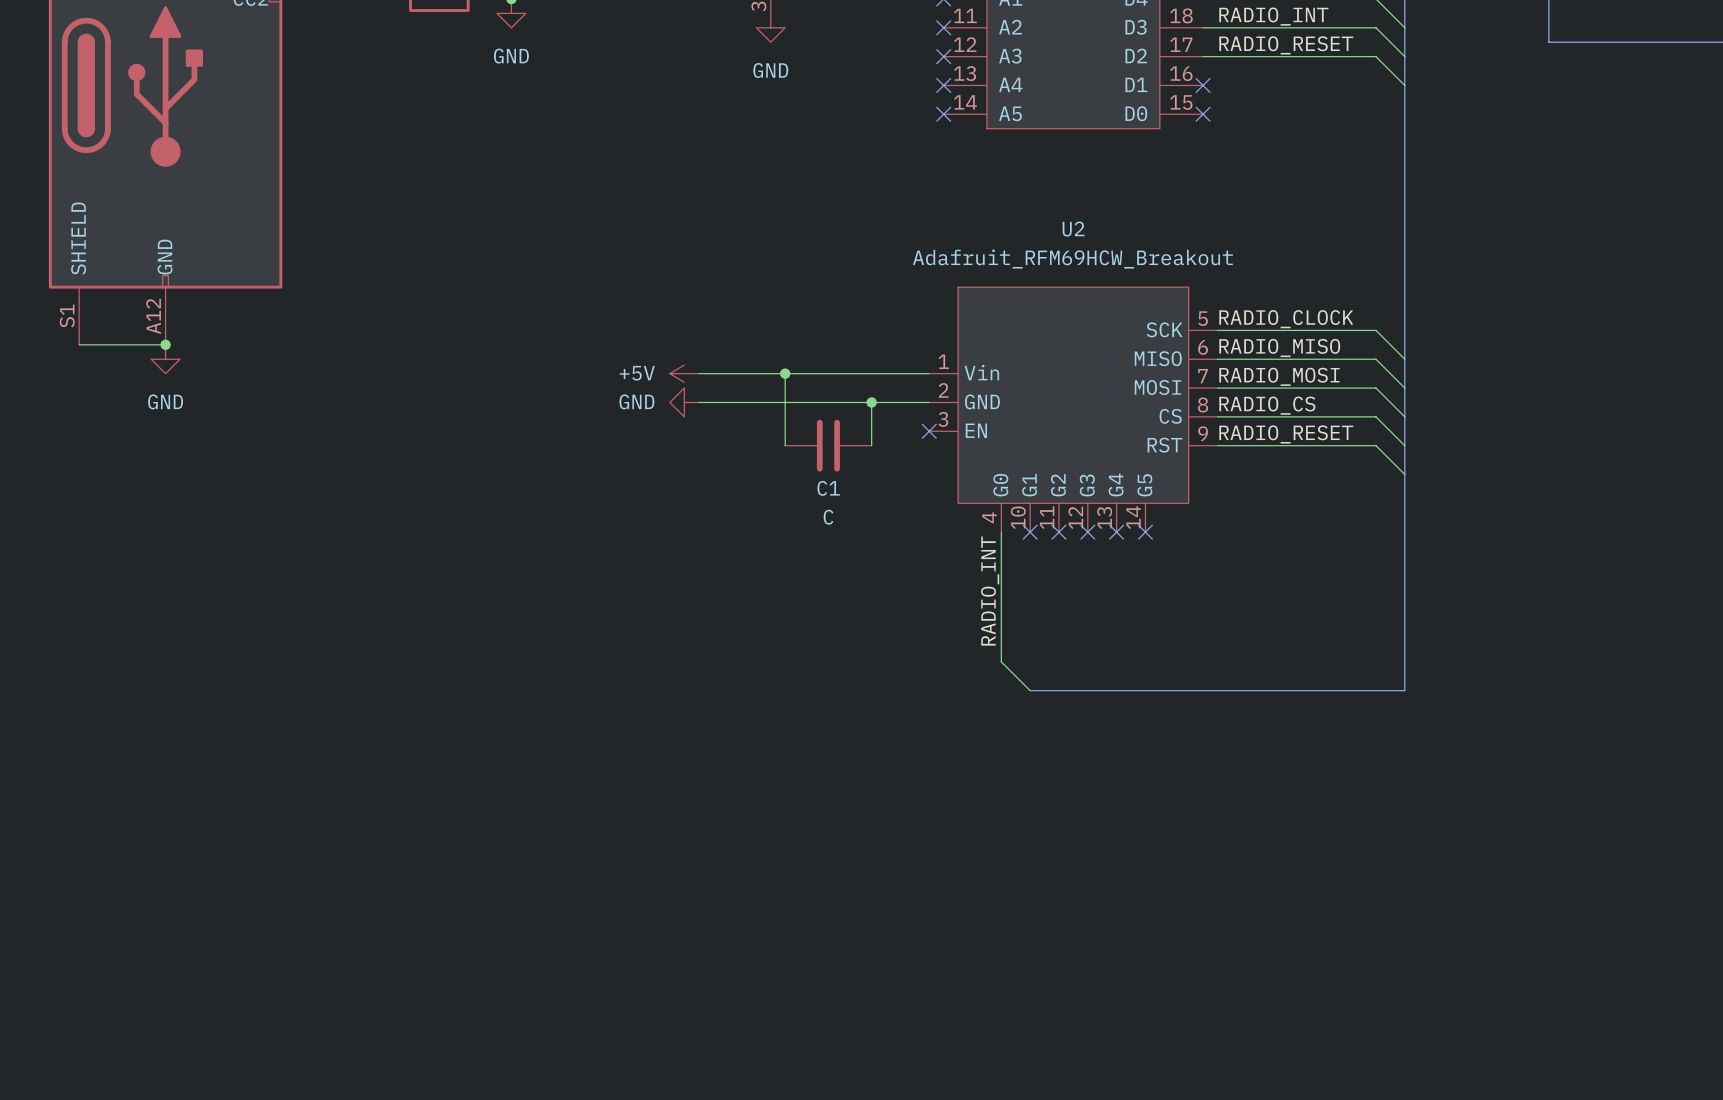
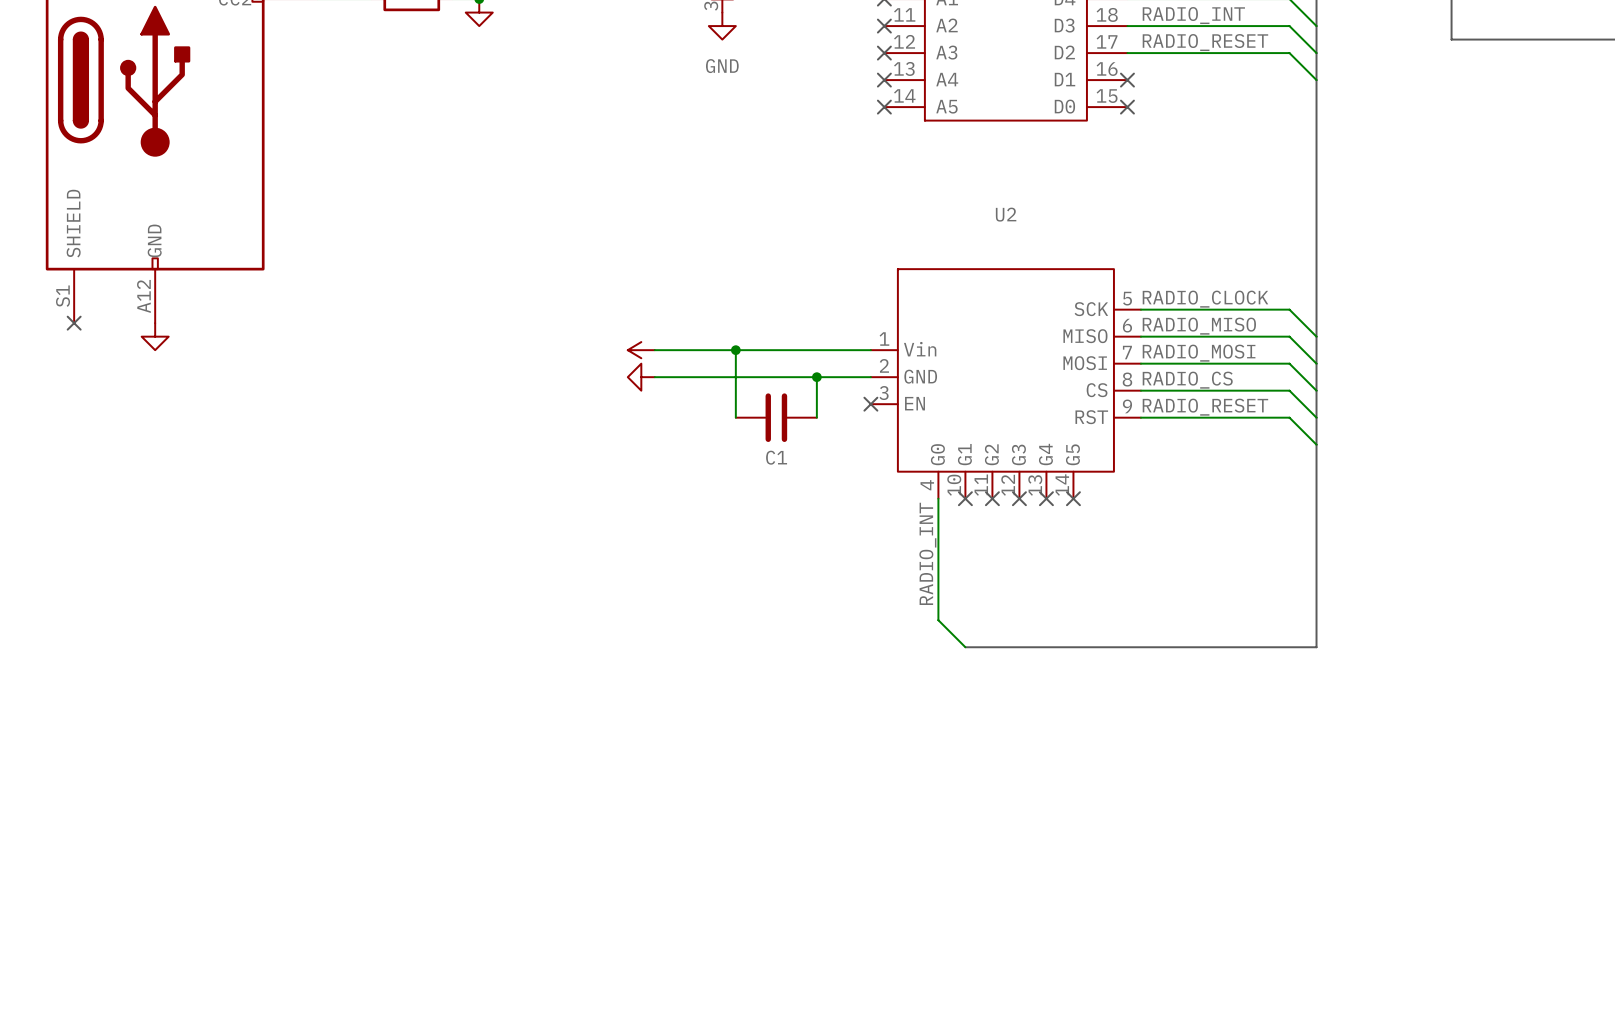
power symbol text: GND (511, 56) -> none
U2 value: Adafruit_RFM69HCW_Breakout (1072, 259) -> none
wire: (79, 344) (165, 344) -> none
no-connect mark: none -> (74, 323)
junction: (165, 344) -> none
power symbol text: +5V (637, 373) -> none
power symbol text: GND (165, 401) -> none
power symbol text: GND (636, 401) -> none
C1 value: C (828, 517) -> none

